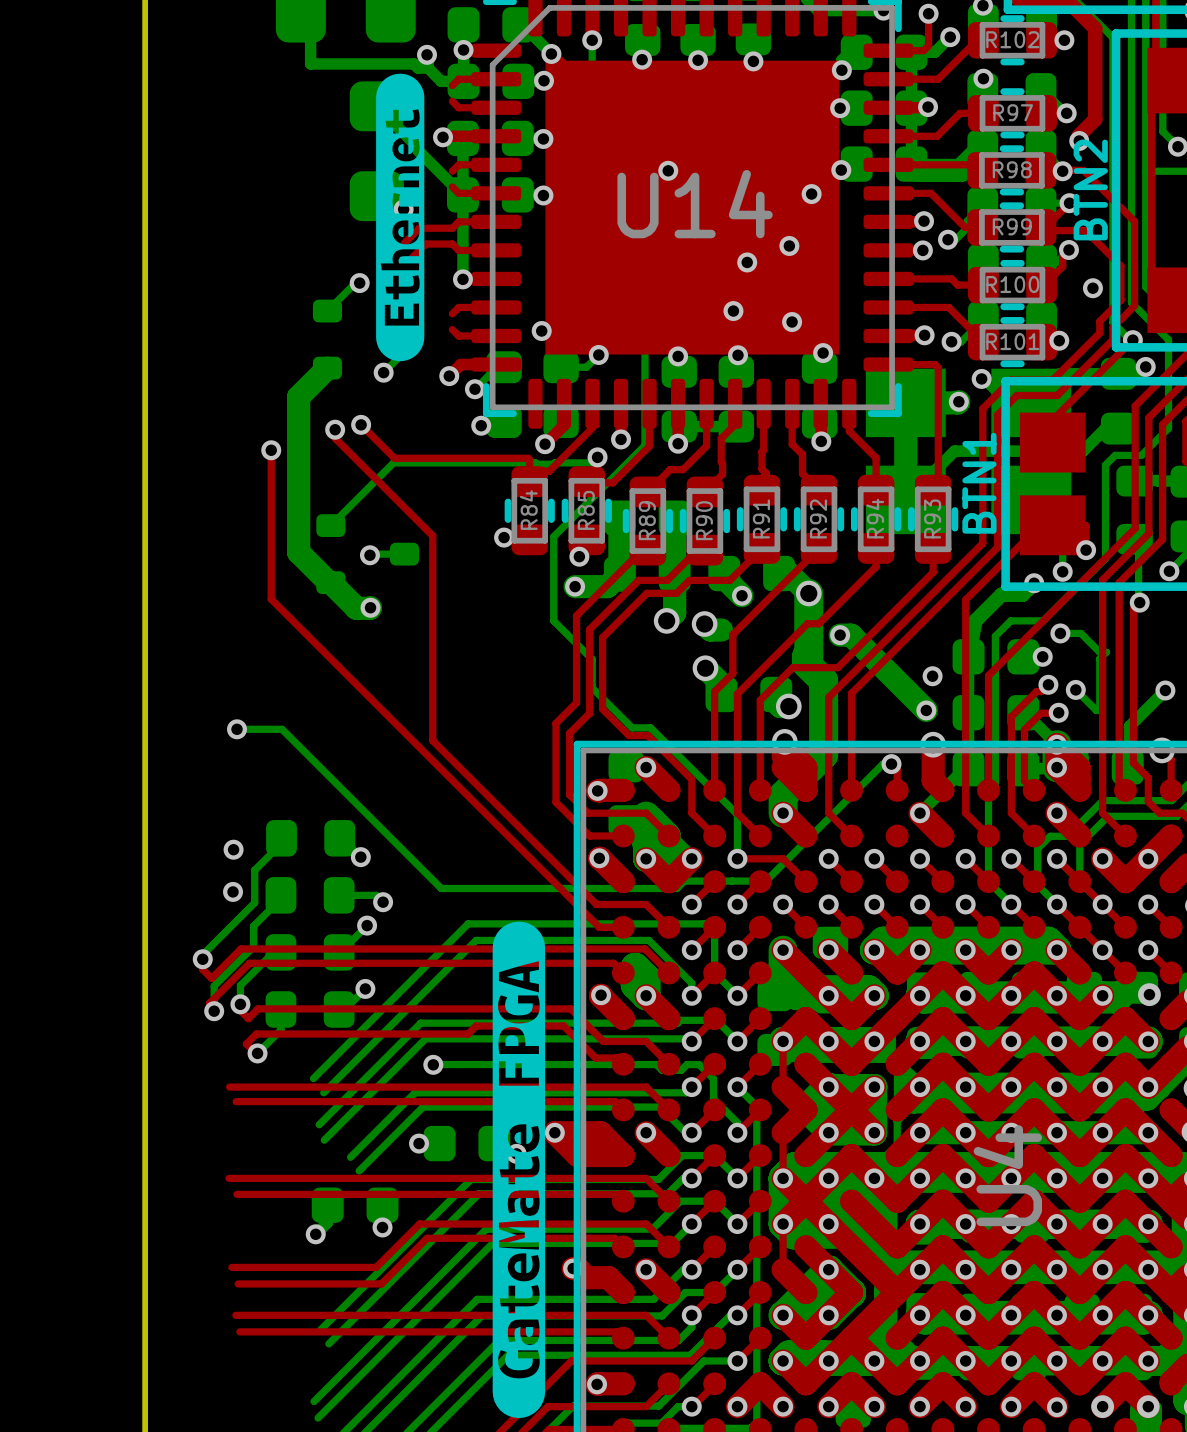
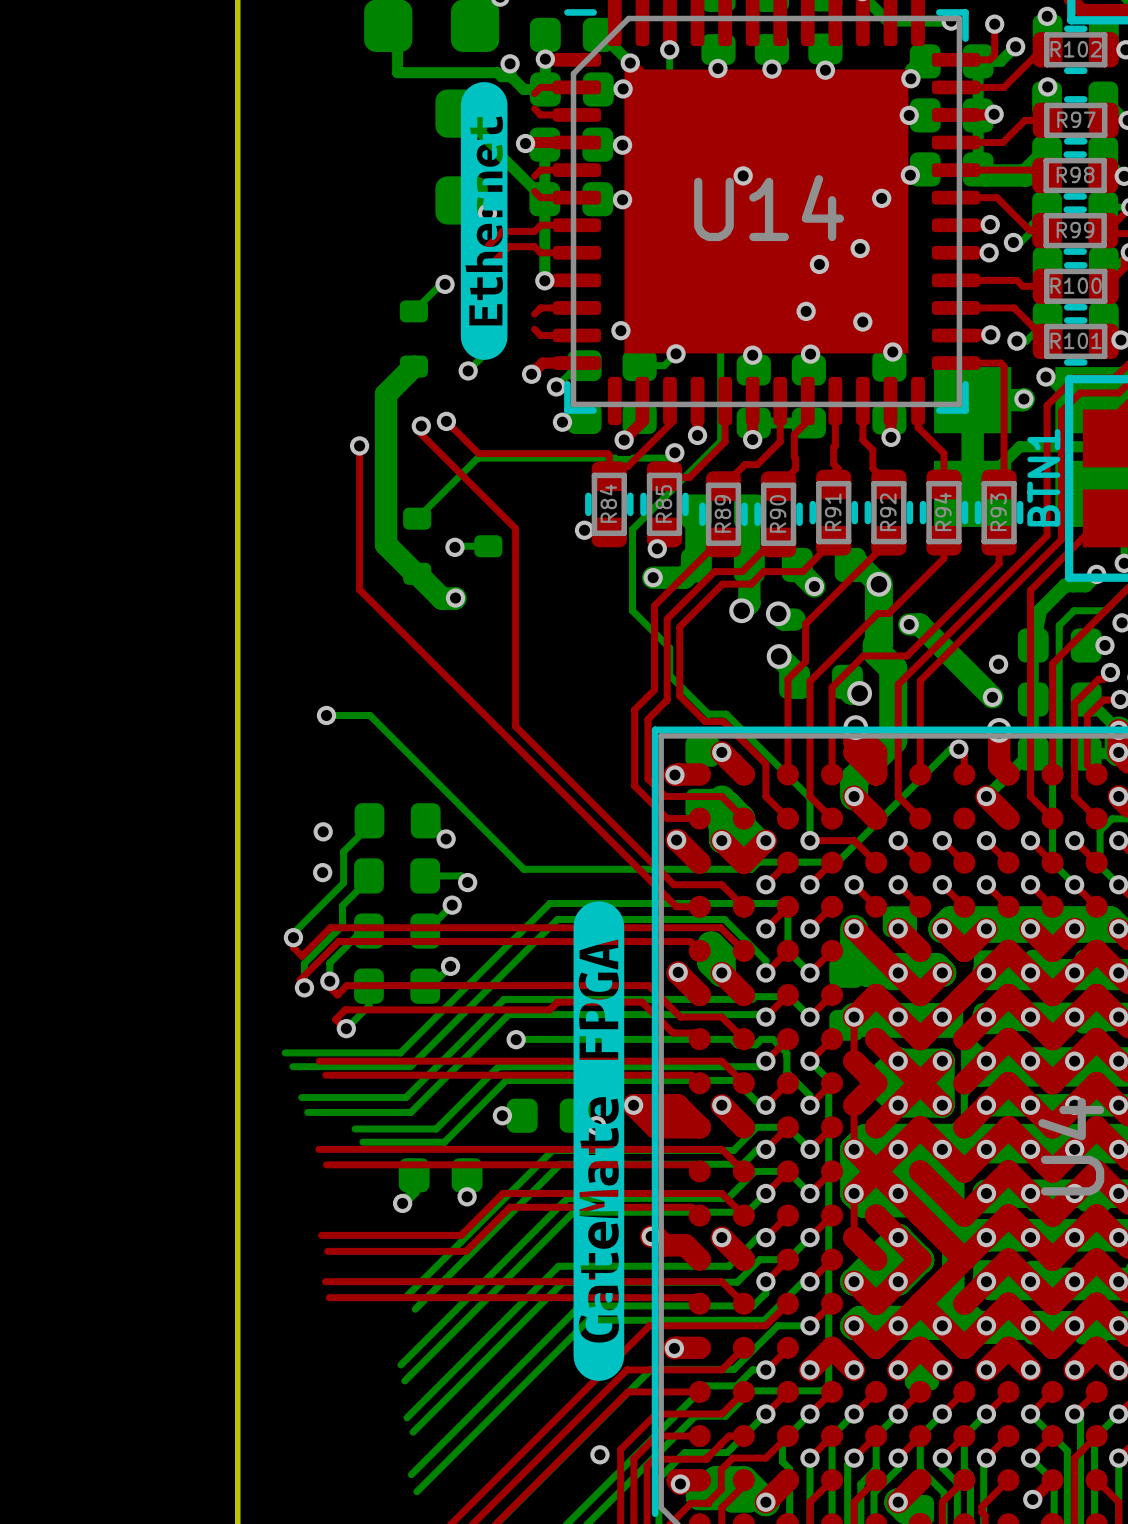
bottom track: none -> (285, 1052) (400, 1052)
bottom track: none -> (292, 1066) (410, 1066)
bottom track: none -> (301, 1097) (405, 1097)
bottom track: none -> (307, 1112) (410, 1112)
bottom track: none -> (355, 1128) (436, 1128)
bottom track: none -> (362, 1142) (444, 1142)

